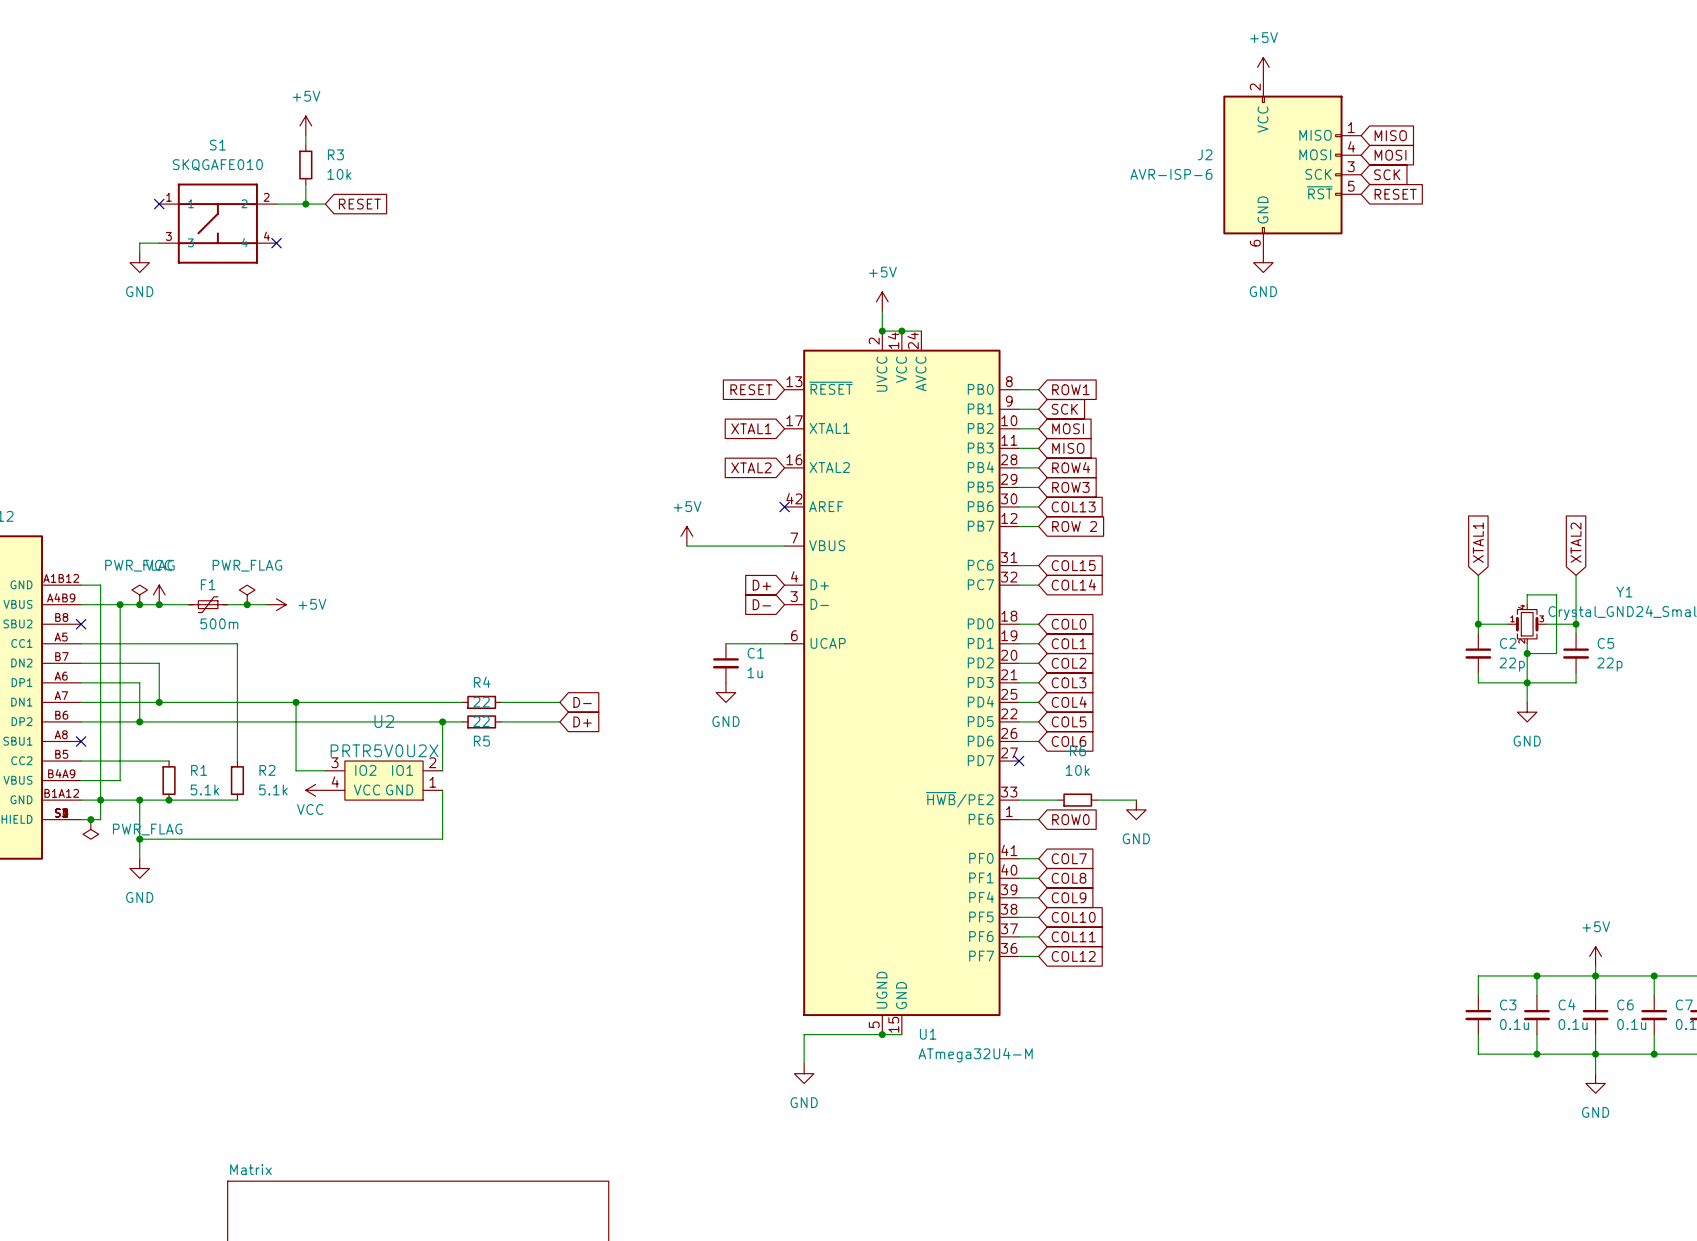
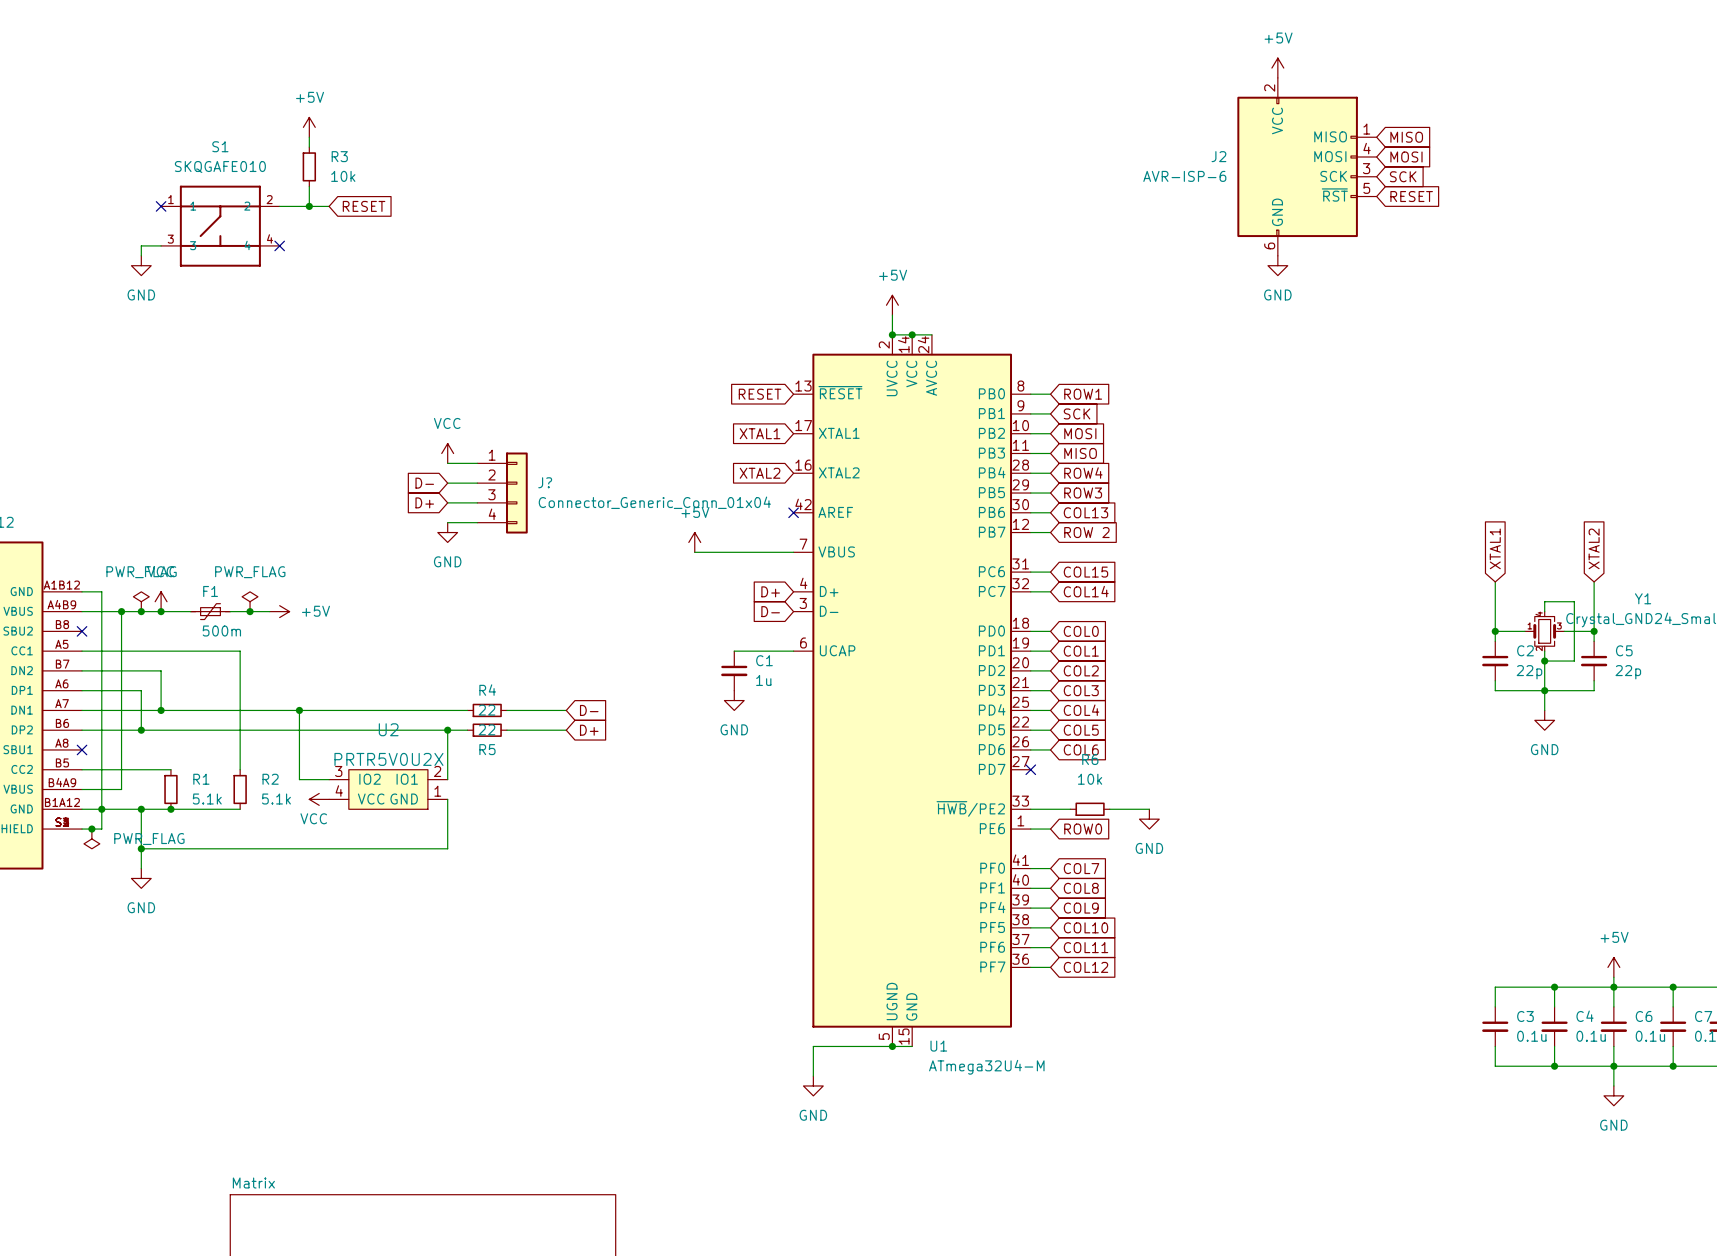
power symbol: none -> VCC (447, 453)
wire: none -> (447, 463) (477, 463)
global label: none -> D- (424, 483)
wire: none -> (447, 483) (477, 483)
J?: none -> Connector_Generic_Conn_01x04 (502, 493)
global label: none -> D+ (424, 502)
wire: none -> (447, 502) (477, 502)
wire: none -> (447, 522) (477, 522)
power symbol: none -> GND (447, 532)

